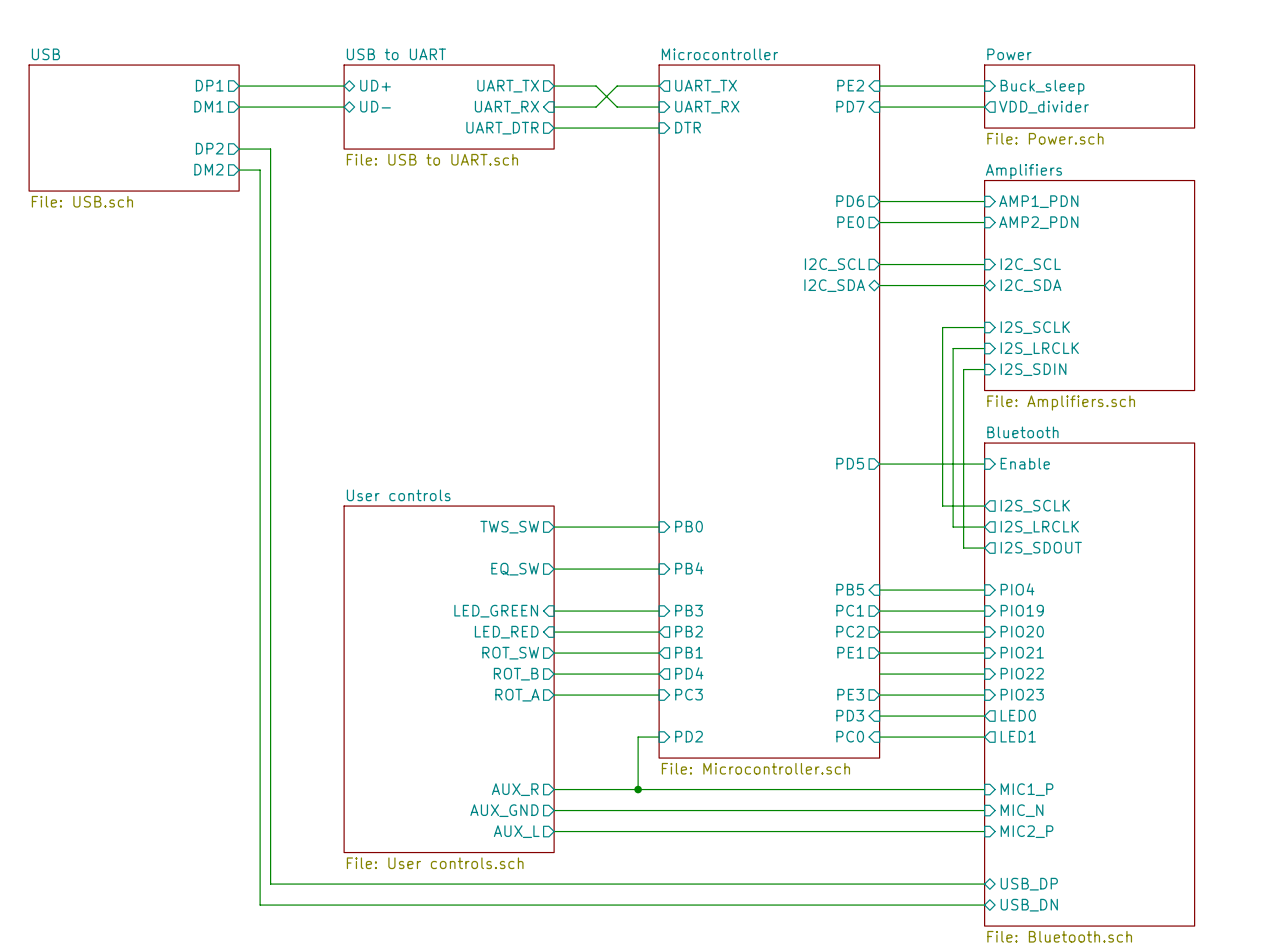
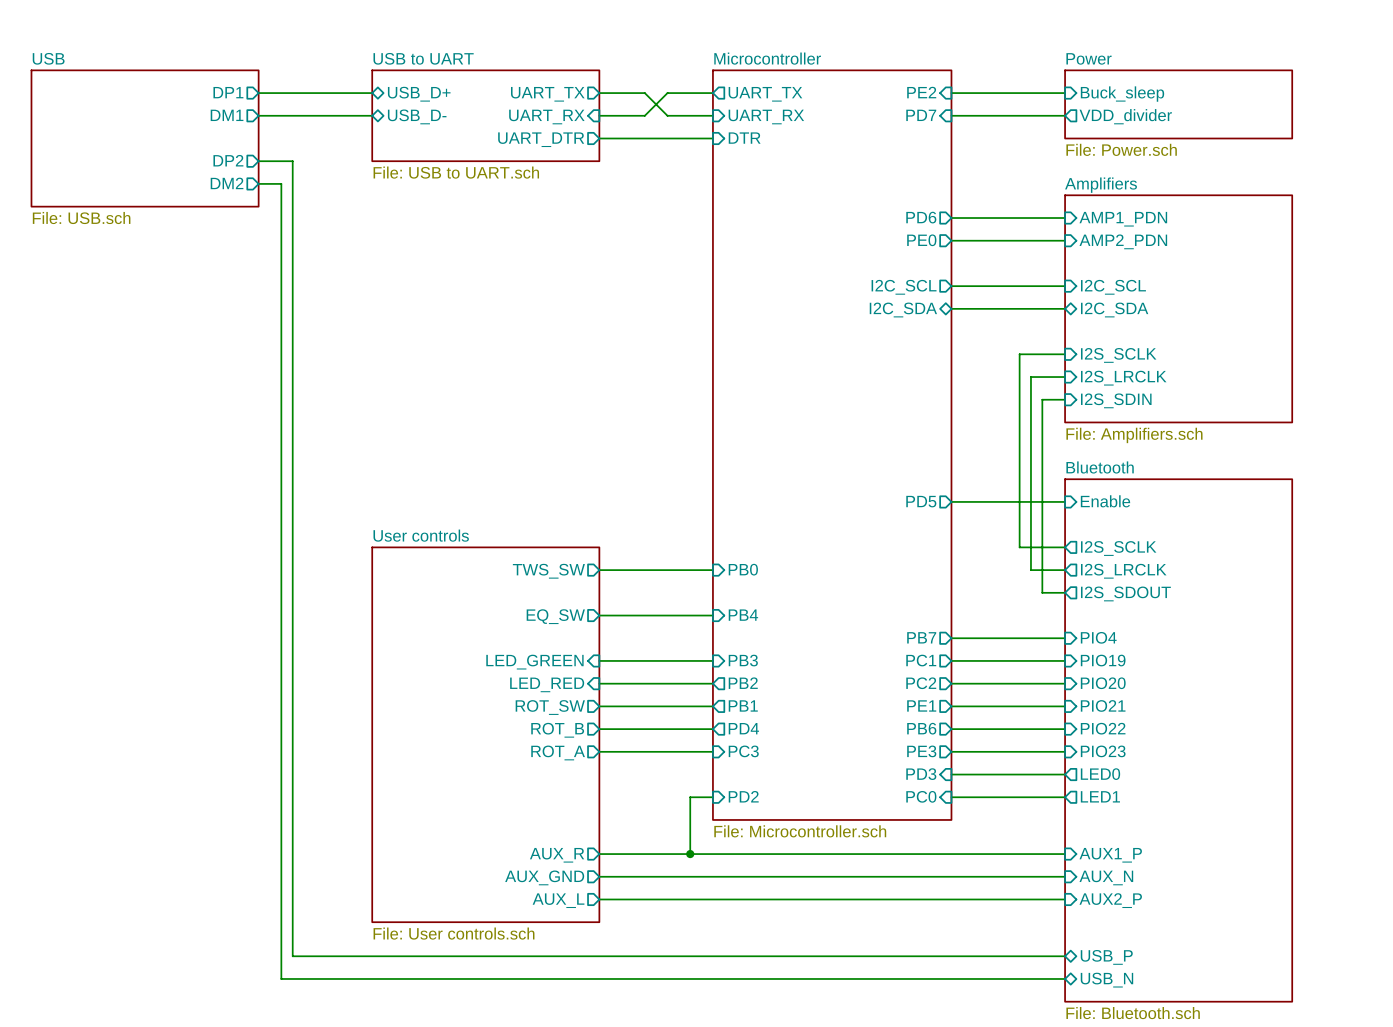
sheet pin: UD+ (375, 85) -> USB_D+ (419, 94)
sheet pin: UD- (375, 106) -> USB_D- (417, 116)
sheet pin shape: input (850, 589) -> output (921, 637)
sheet pin: PB5 (850, 589) -> PB7 (921, 637)
sheet pin: none -> PB6 (921, 728)
sheet pin: MIC1_P (1027, 789) -> AUX1_P (1110, 855)
sheet pin: MIC_N (1022, 810) -> AUX_N (1106, 877)
sheet pin: MIC2_P (1027, 831) -> AUX2_P (1110, 900)
sheet pin: USB_DP (1029, 884) -> USB_P (1106, 957)
sheet pin: USB_DN (1029, 905) -> USB_N (1106, 980)

